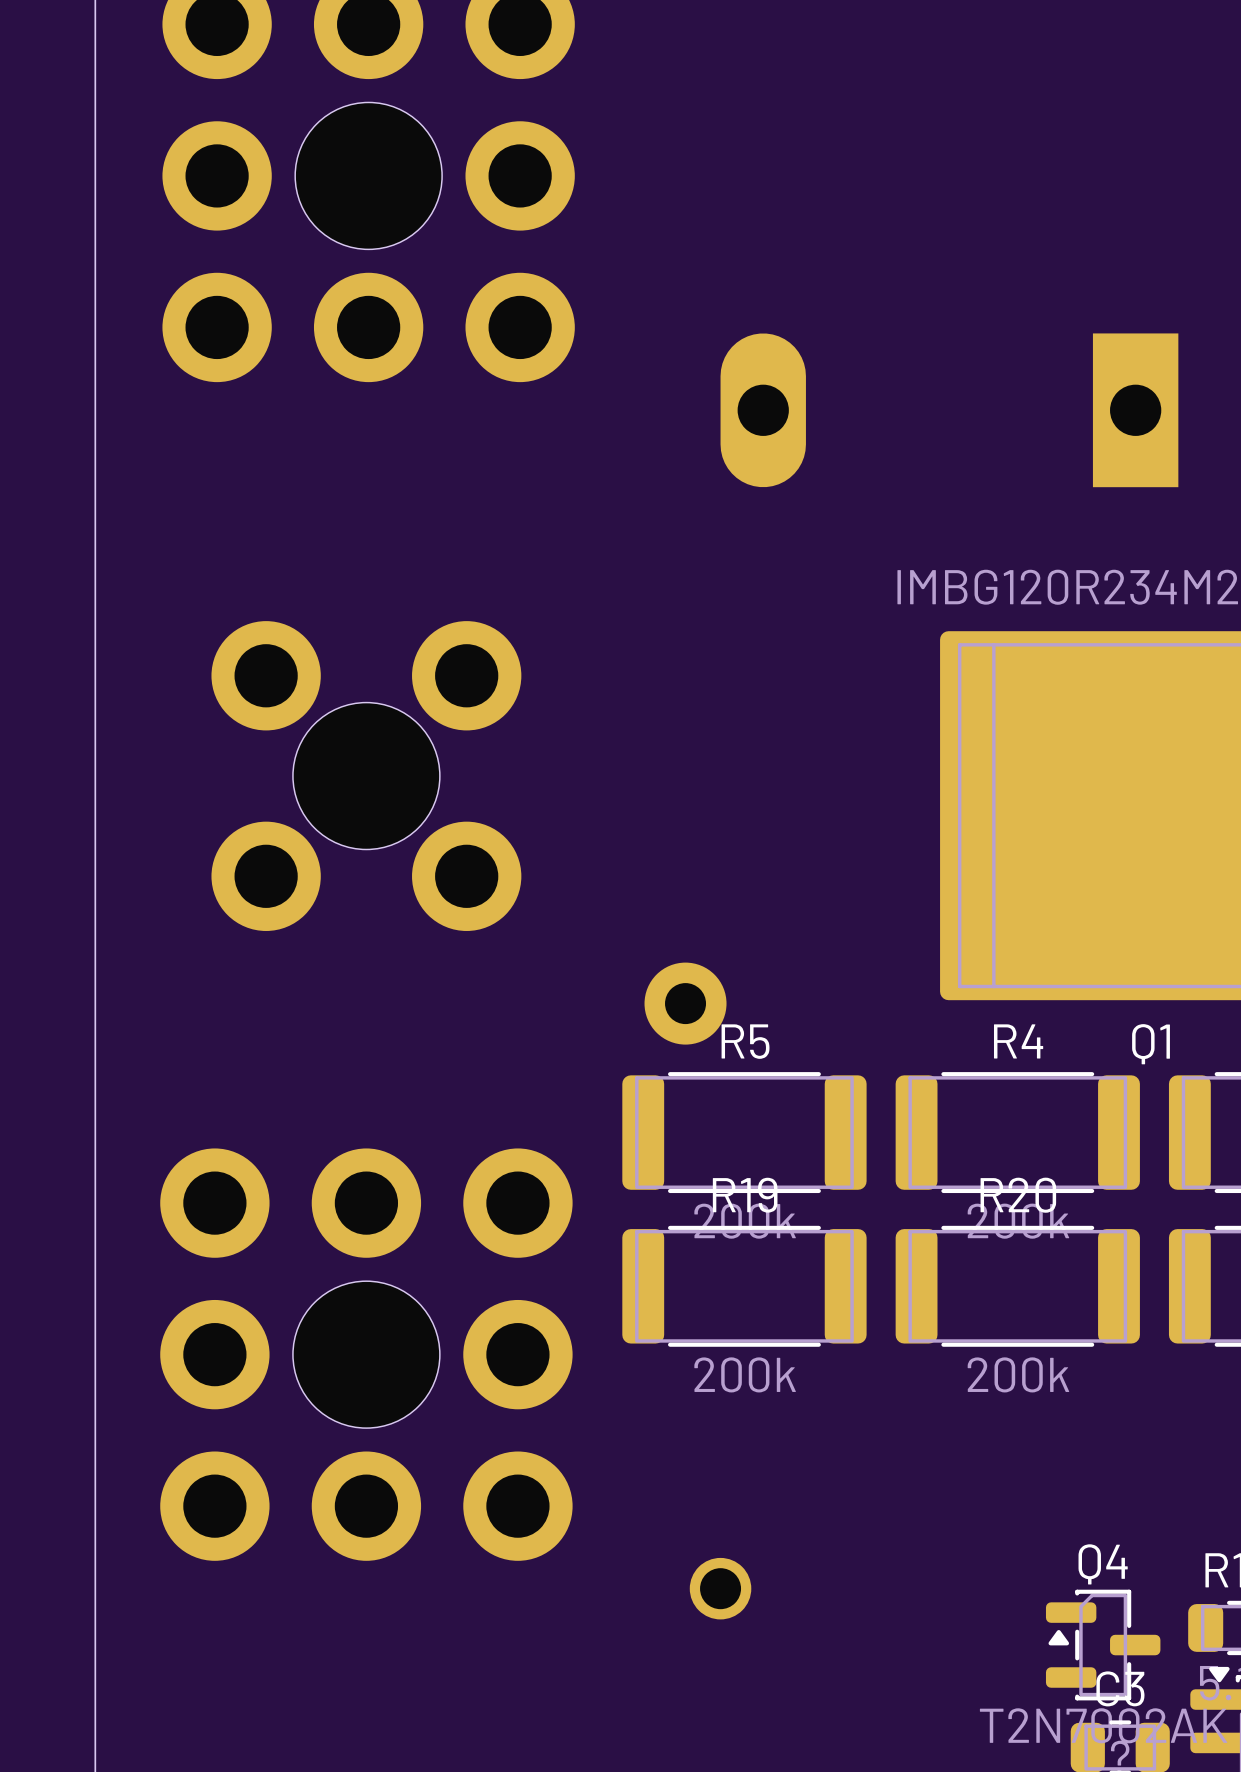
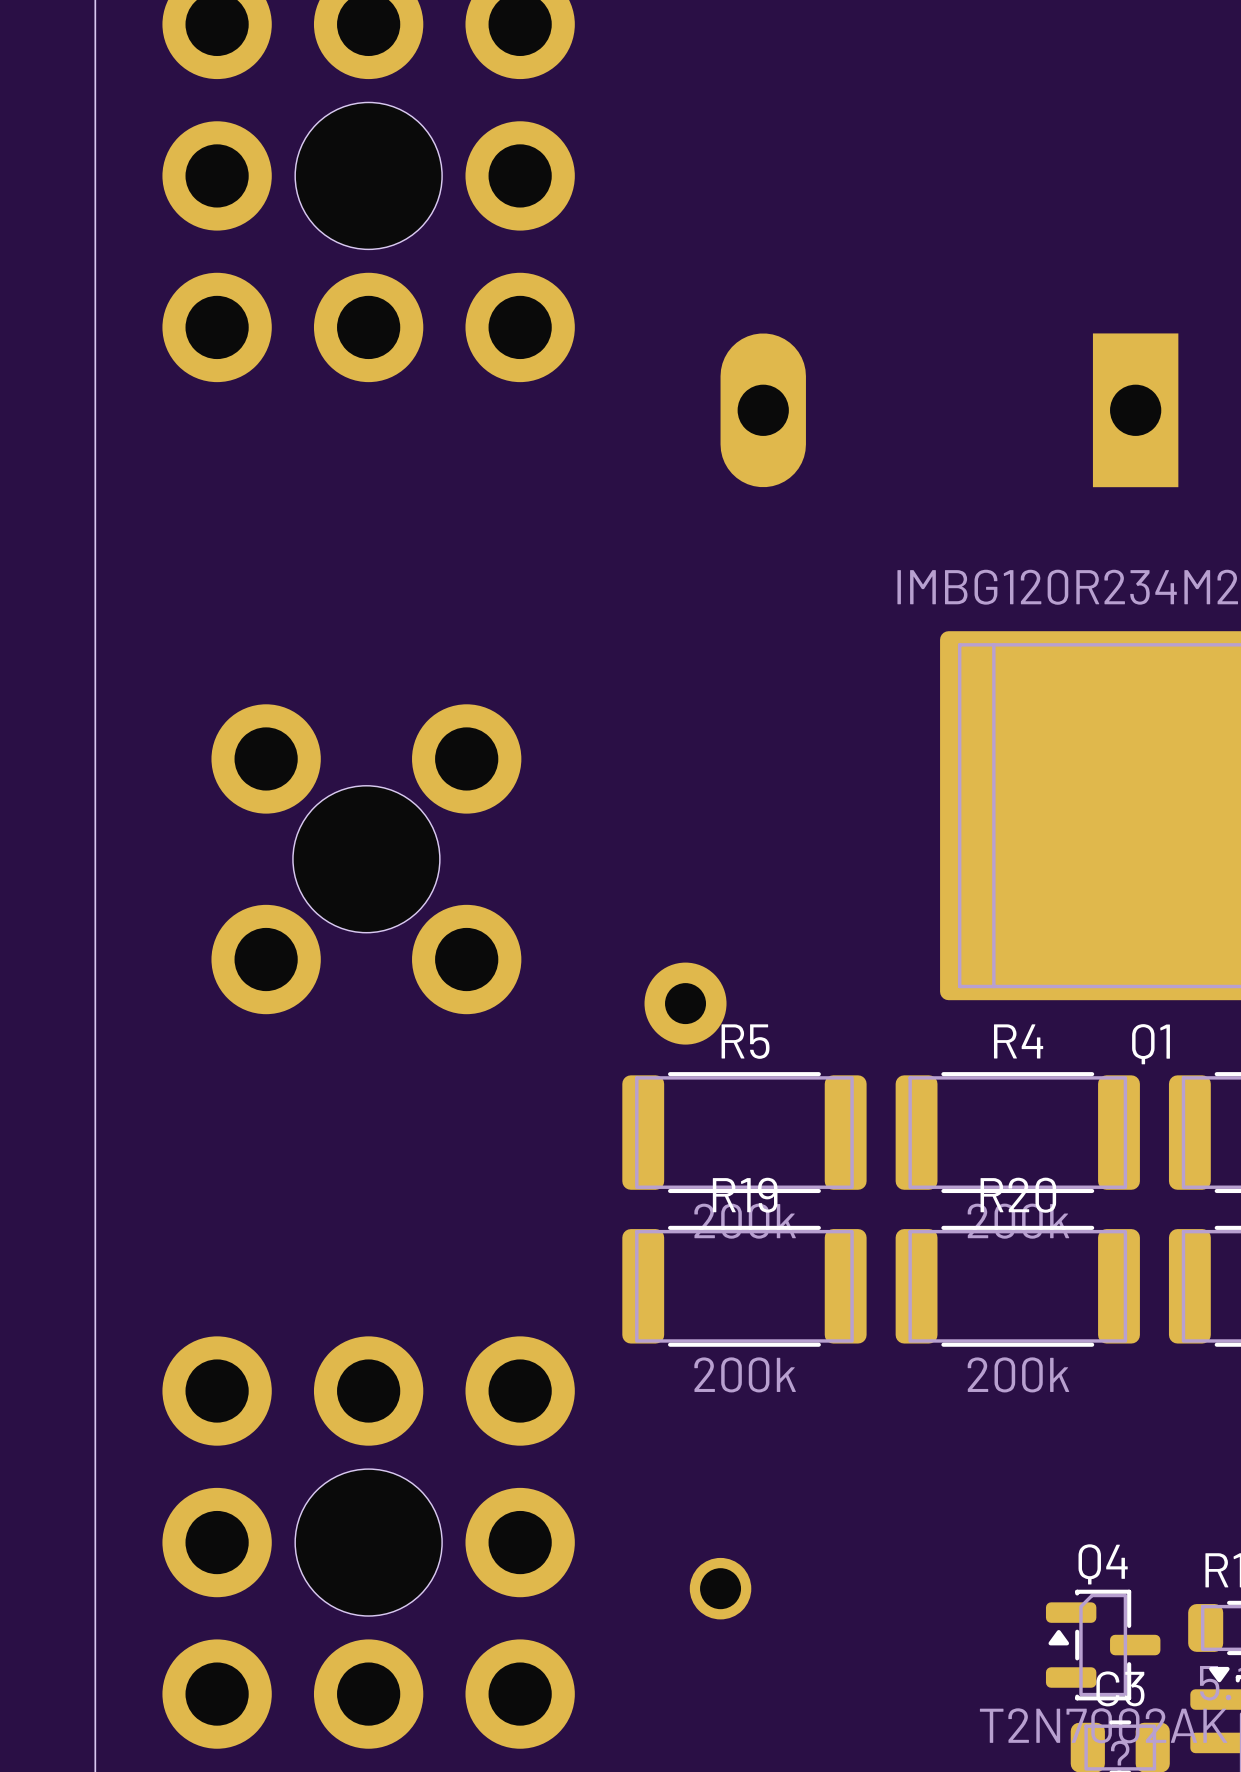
part position: (366, 776) -> (366, 859)
part position: (366, 1354) -> (368, 1542)

